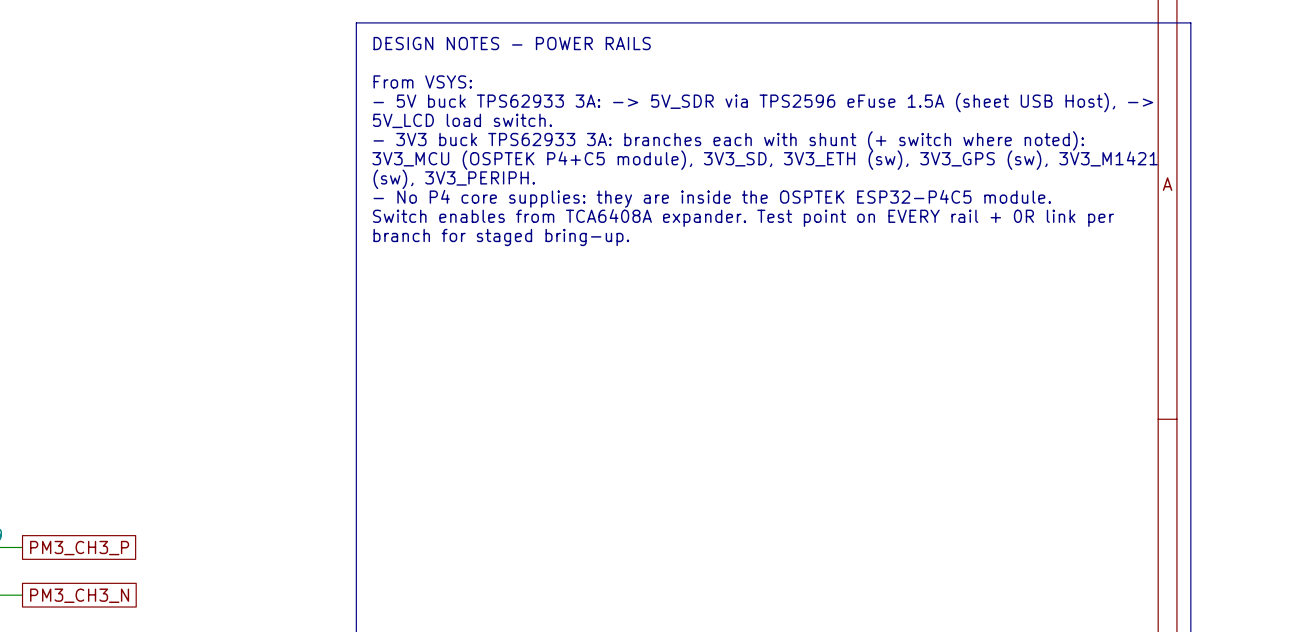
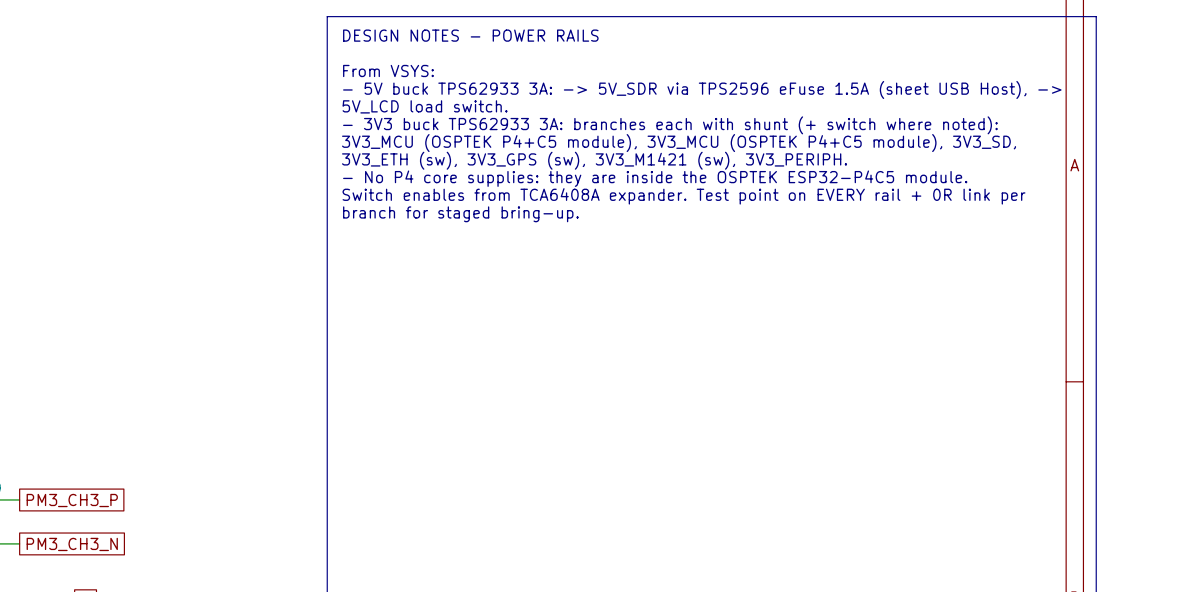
text: 3V3_MCU (OSPTEK P4+C5 module), 3V3_SD, 3V3_ETH (sw), 3V3_GPS (sw), 3V3_M1421 (765, 160) -> 3V3_MCU (OSPTEK P4+C5 module), 3V3_MCU (OSPTEK P4+C5 module), 3V3_SD, (679, 143)
text: (sw), 3V3_PERIPH. (454, 179) -> 3V3_ETH (sw), 3V3_GPS (sw), 3V3_M1421 (sw), 3V3_PERIPH. (594, 160)

